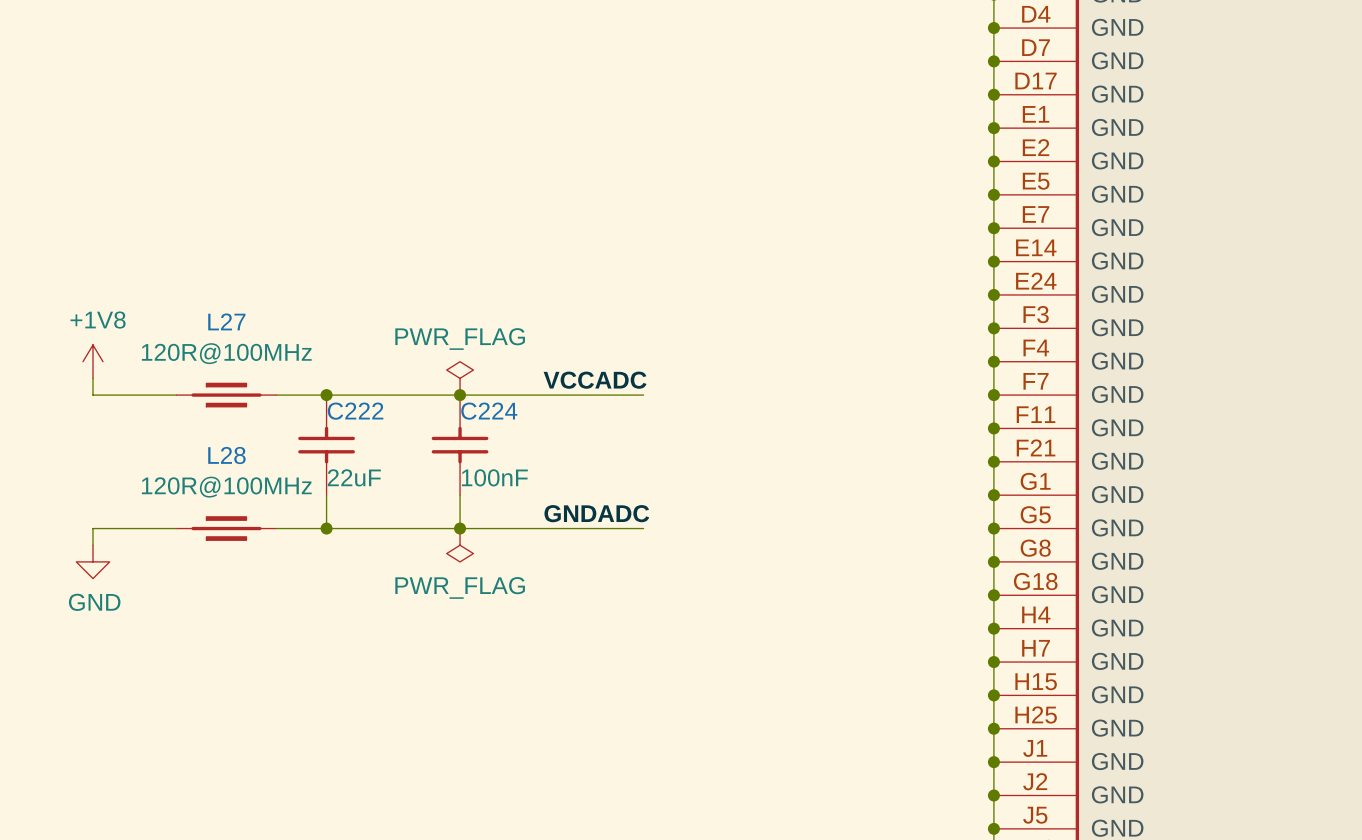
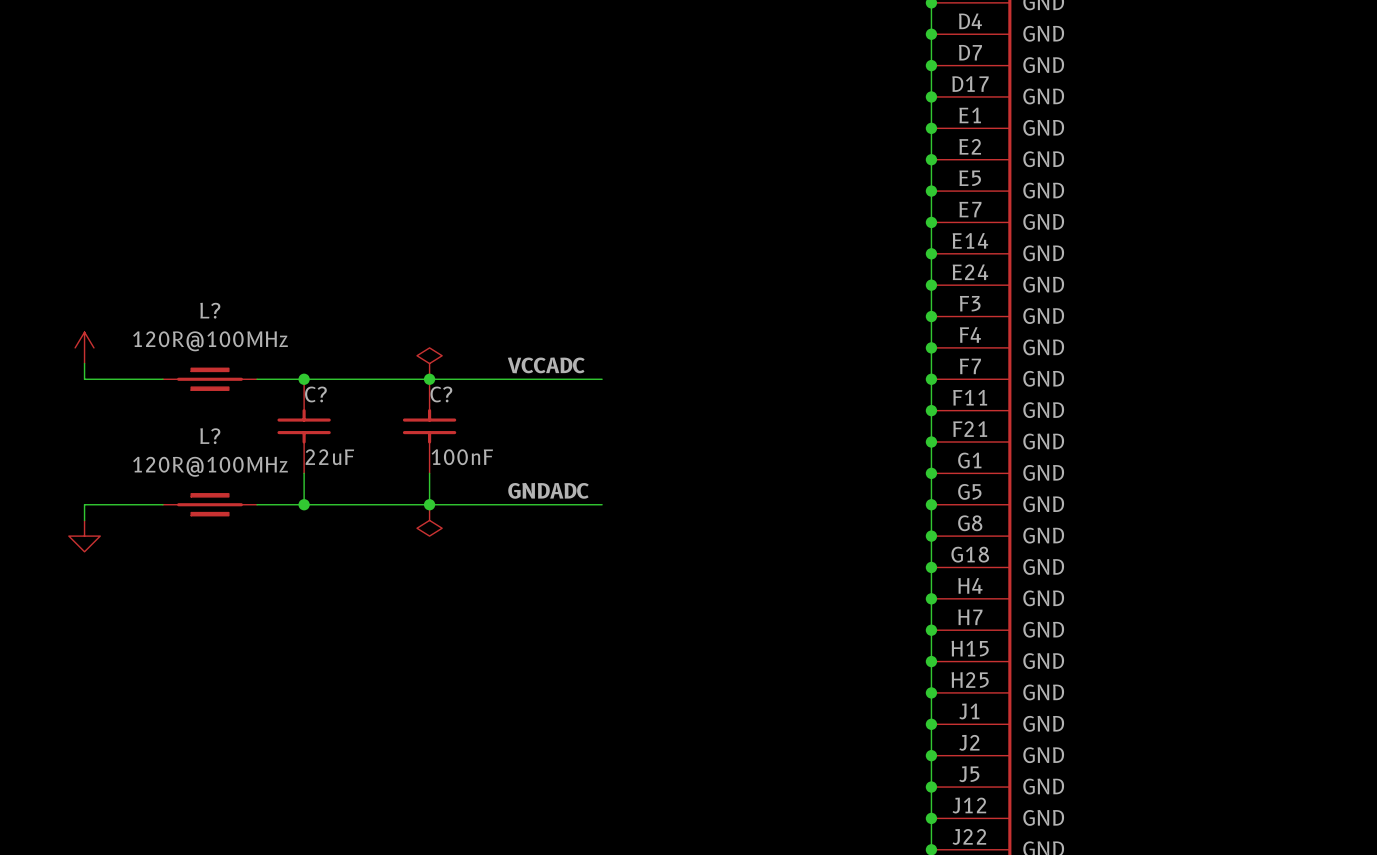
power symbol text: +1V8 (98, 320) -> none
L27 name: L27 (226, 321) -> L? (210, 310)
power symbol text: PWR_FLAG (460, 339) -> none
C222 name: C222 (355, 411) -> C? (315, 394)
C224 name: C224 (489, 411) -> C? (441, 394)
L28 name: L28 (226, 455) -> L? (210, 436)
power symbol text: PWR_FLAG (460, 587) -> none
power symbol text: GND (94, 602) -> none

